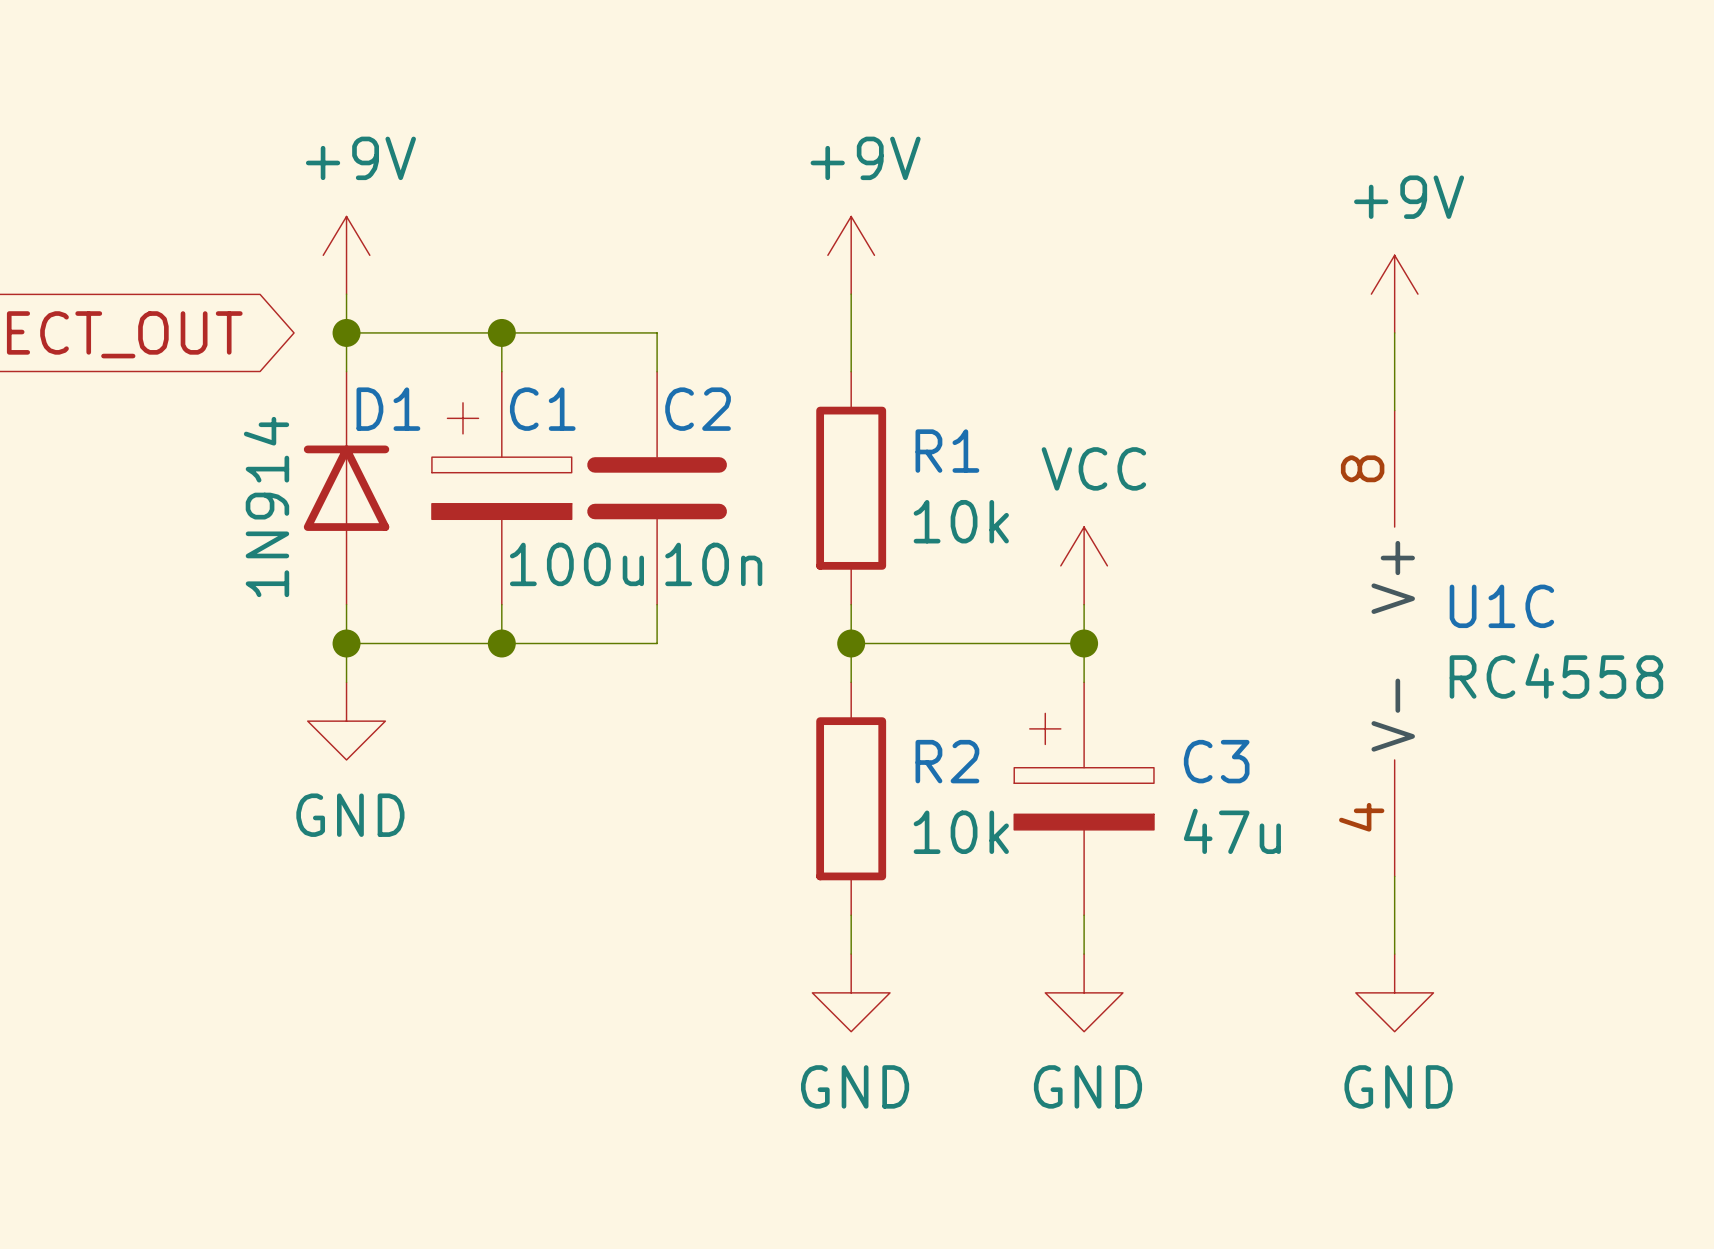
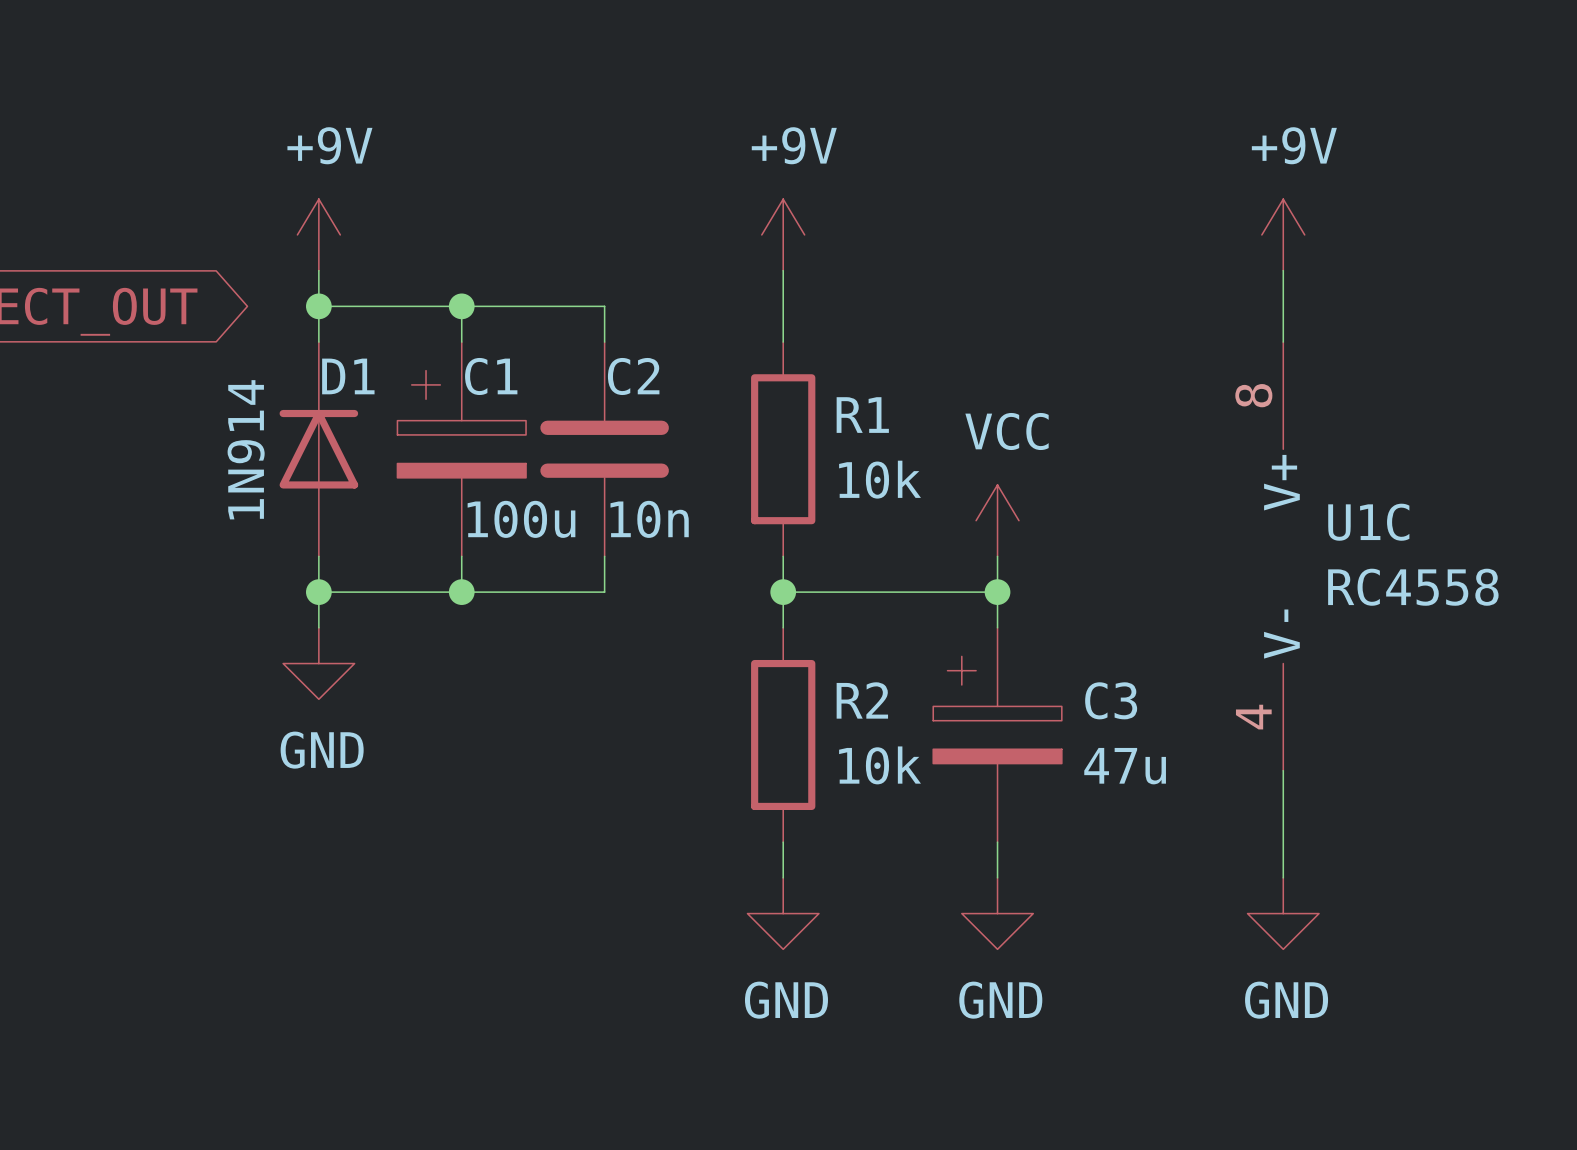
power symbol position: +9V (1394, 294) -> +9V (1283, 234)
U1C position: (1394, 643) -> (1283, 556)

